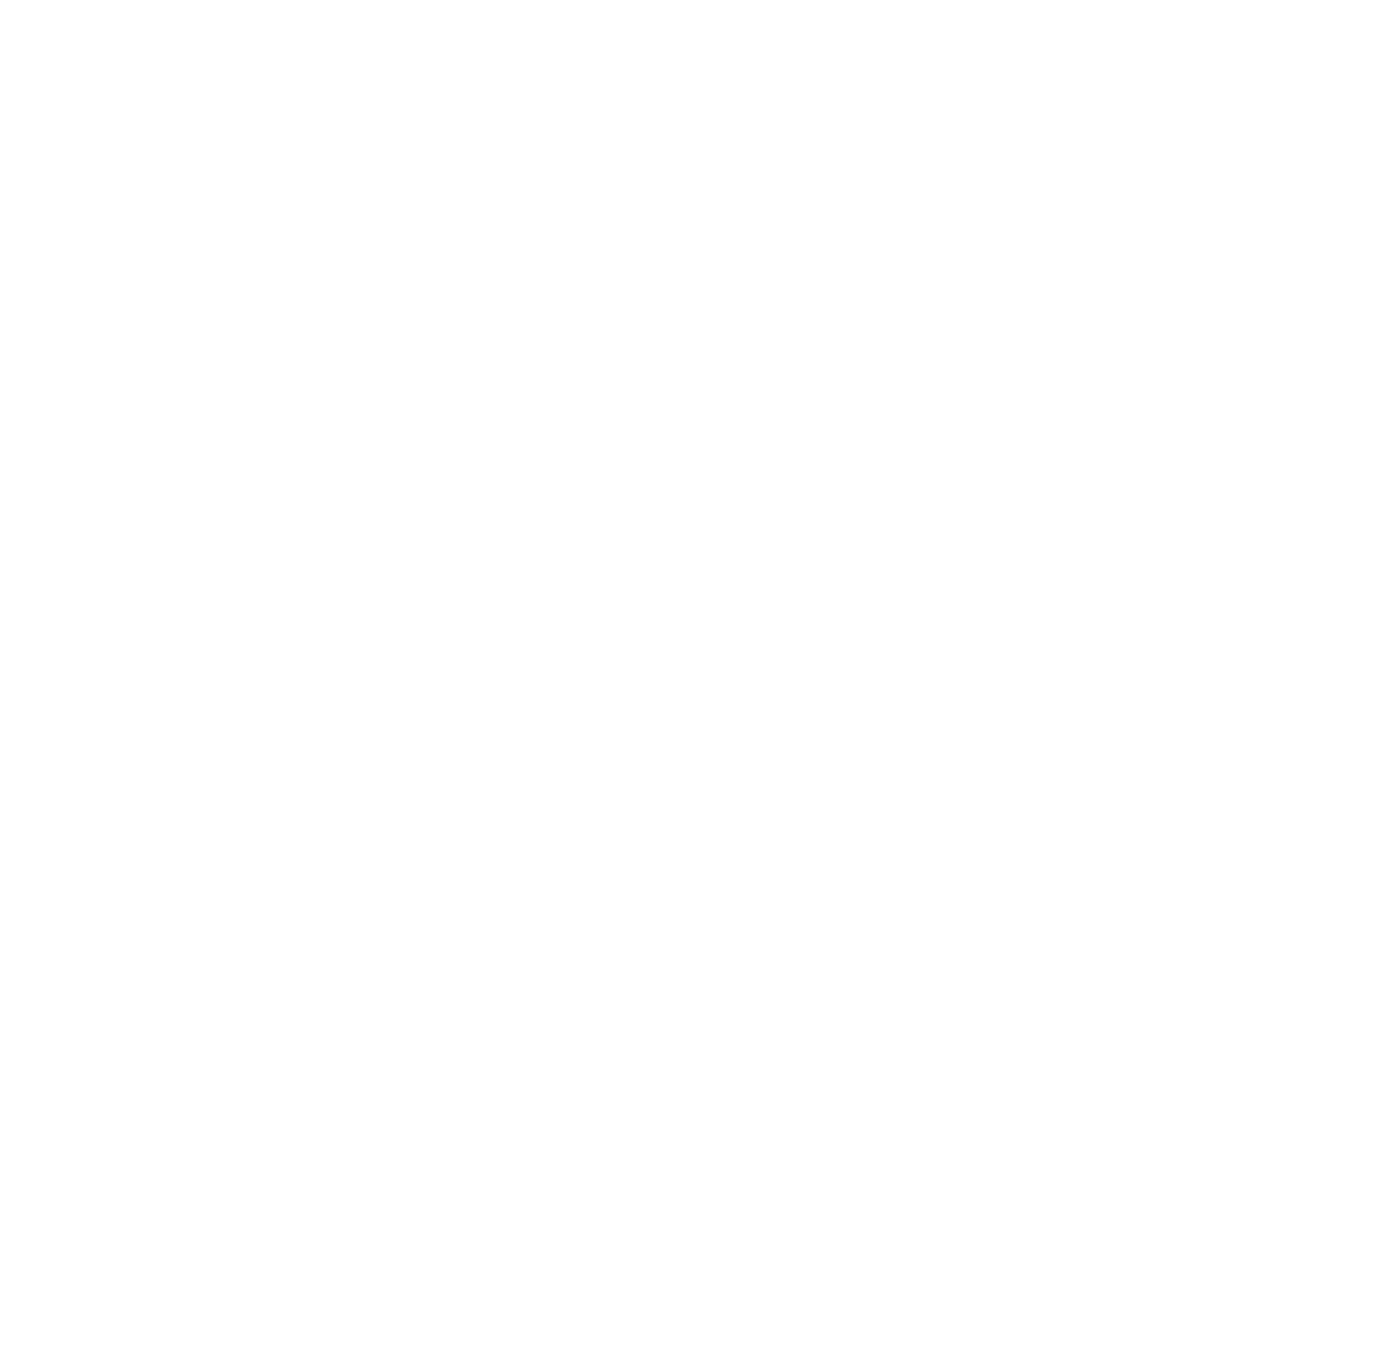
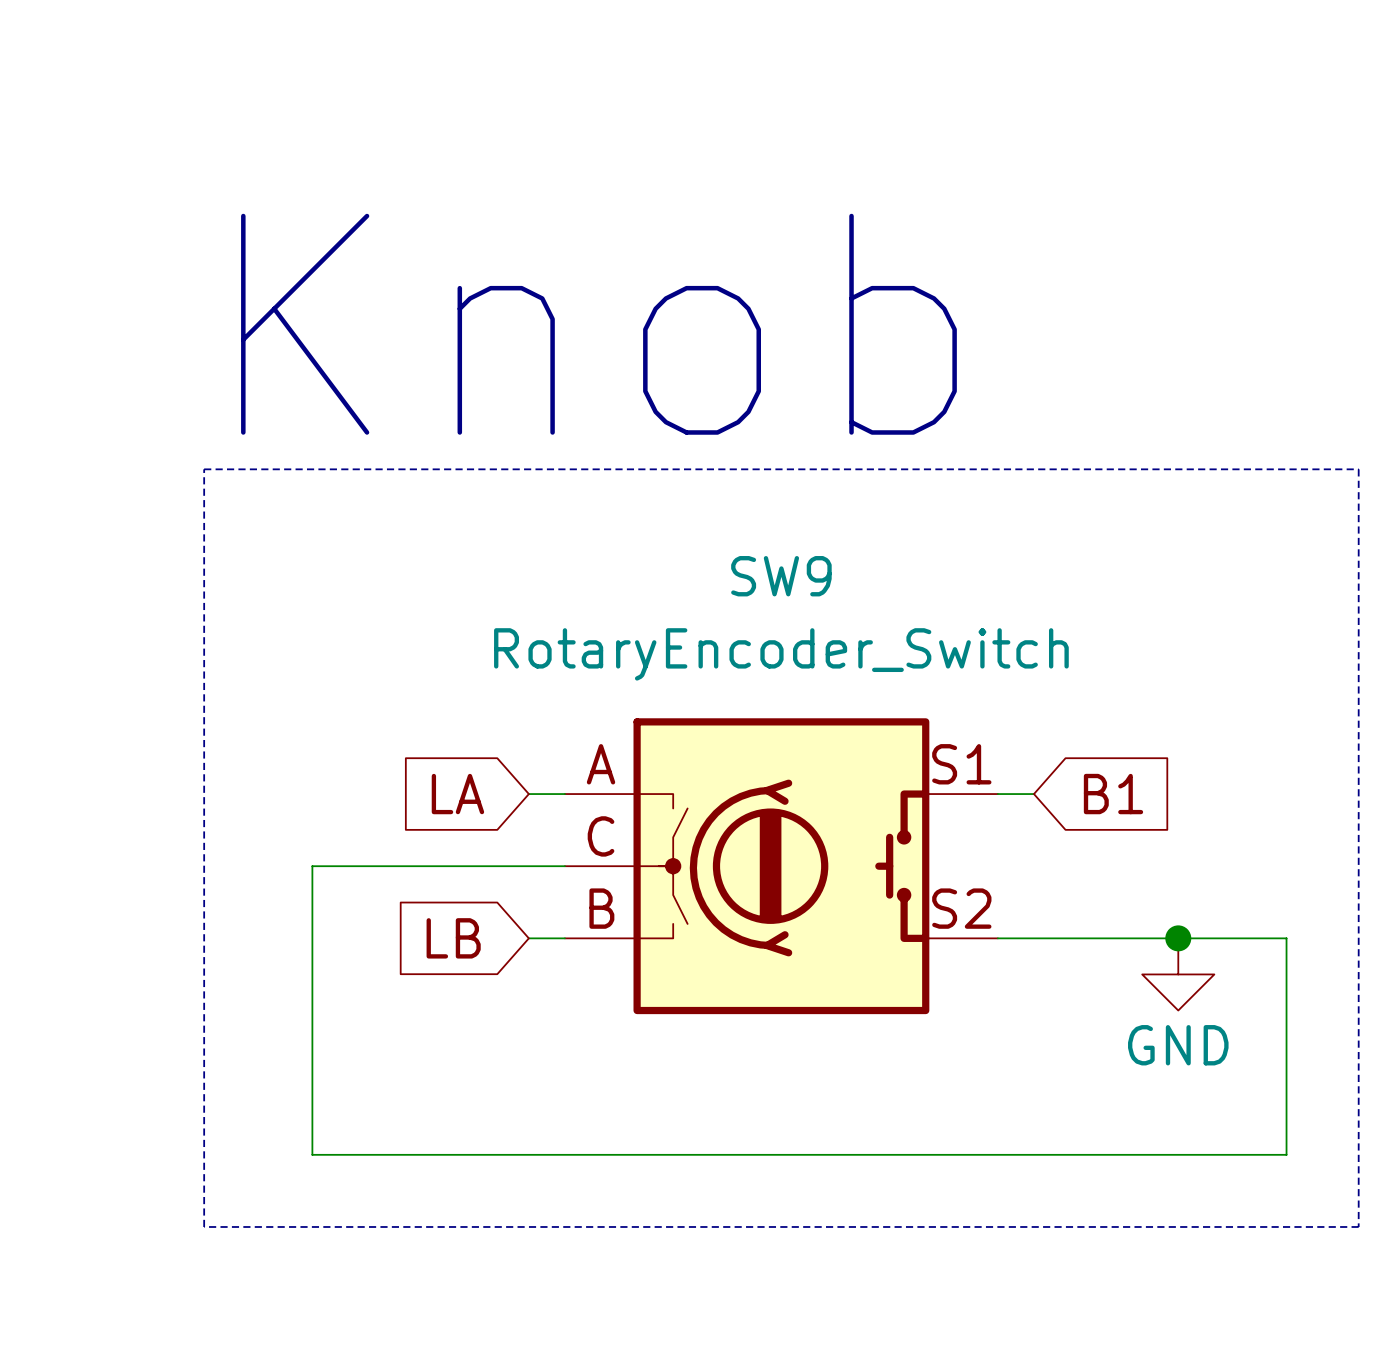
text: none -> Knob (598, 324)
line: none -> (204, 469) (1358, 469) (1358, 1226) (204, 1226) (204, 469)
global label: none -> LA (457, 794)
wire: none -> (528, 794) (564, 794)
wire: none -> (997, 794) (1033, 794)
global label: none -> B1 (1113, 794)
wire: none -> (564, 866) (312, 866) (312, 1154) (1286, 1154) (1286, 938) (997, 938)
SW9: none -> RotaryEncoder_Switch (781, 866)
global label: none -> LB (453, 938)
wire: none -> (528, 938) (564, 938)
junction: none -> (1178, 938)
power symbol: none -> GND (1178, 974)

